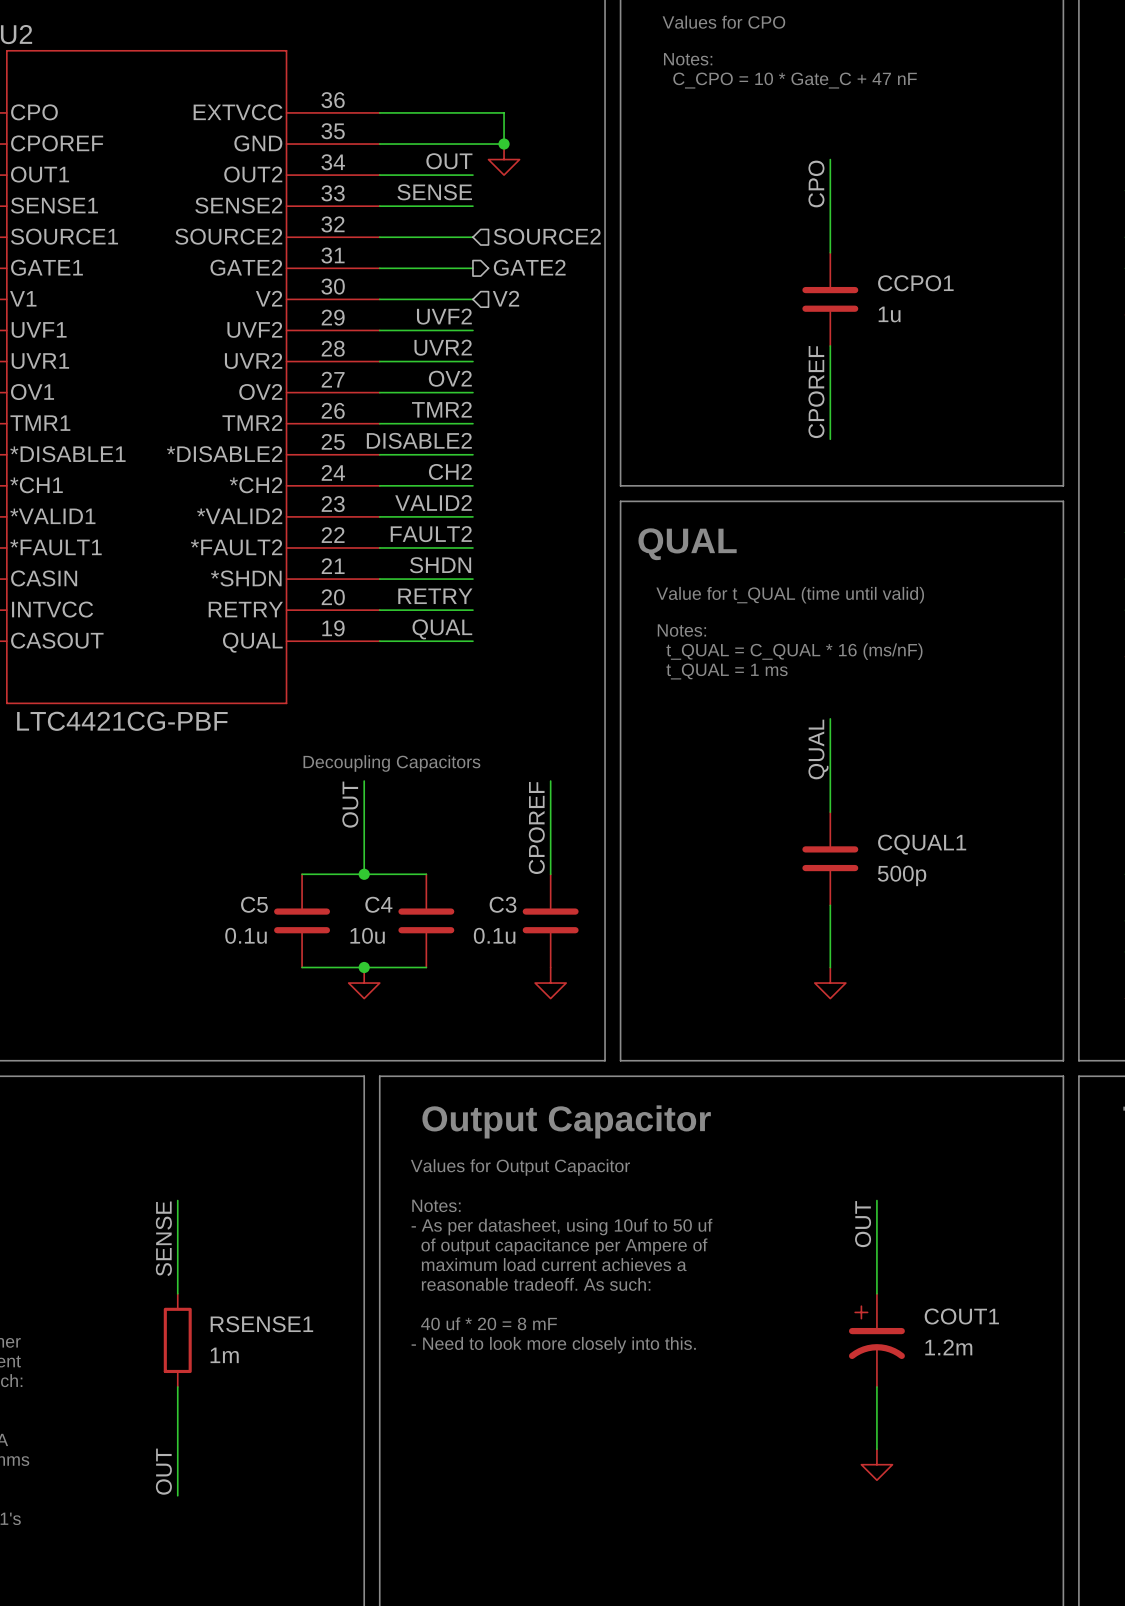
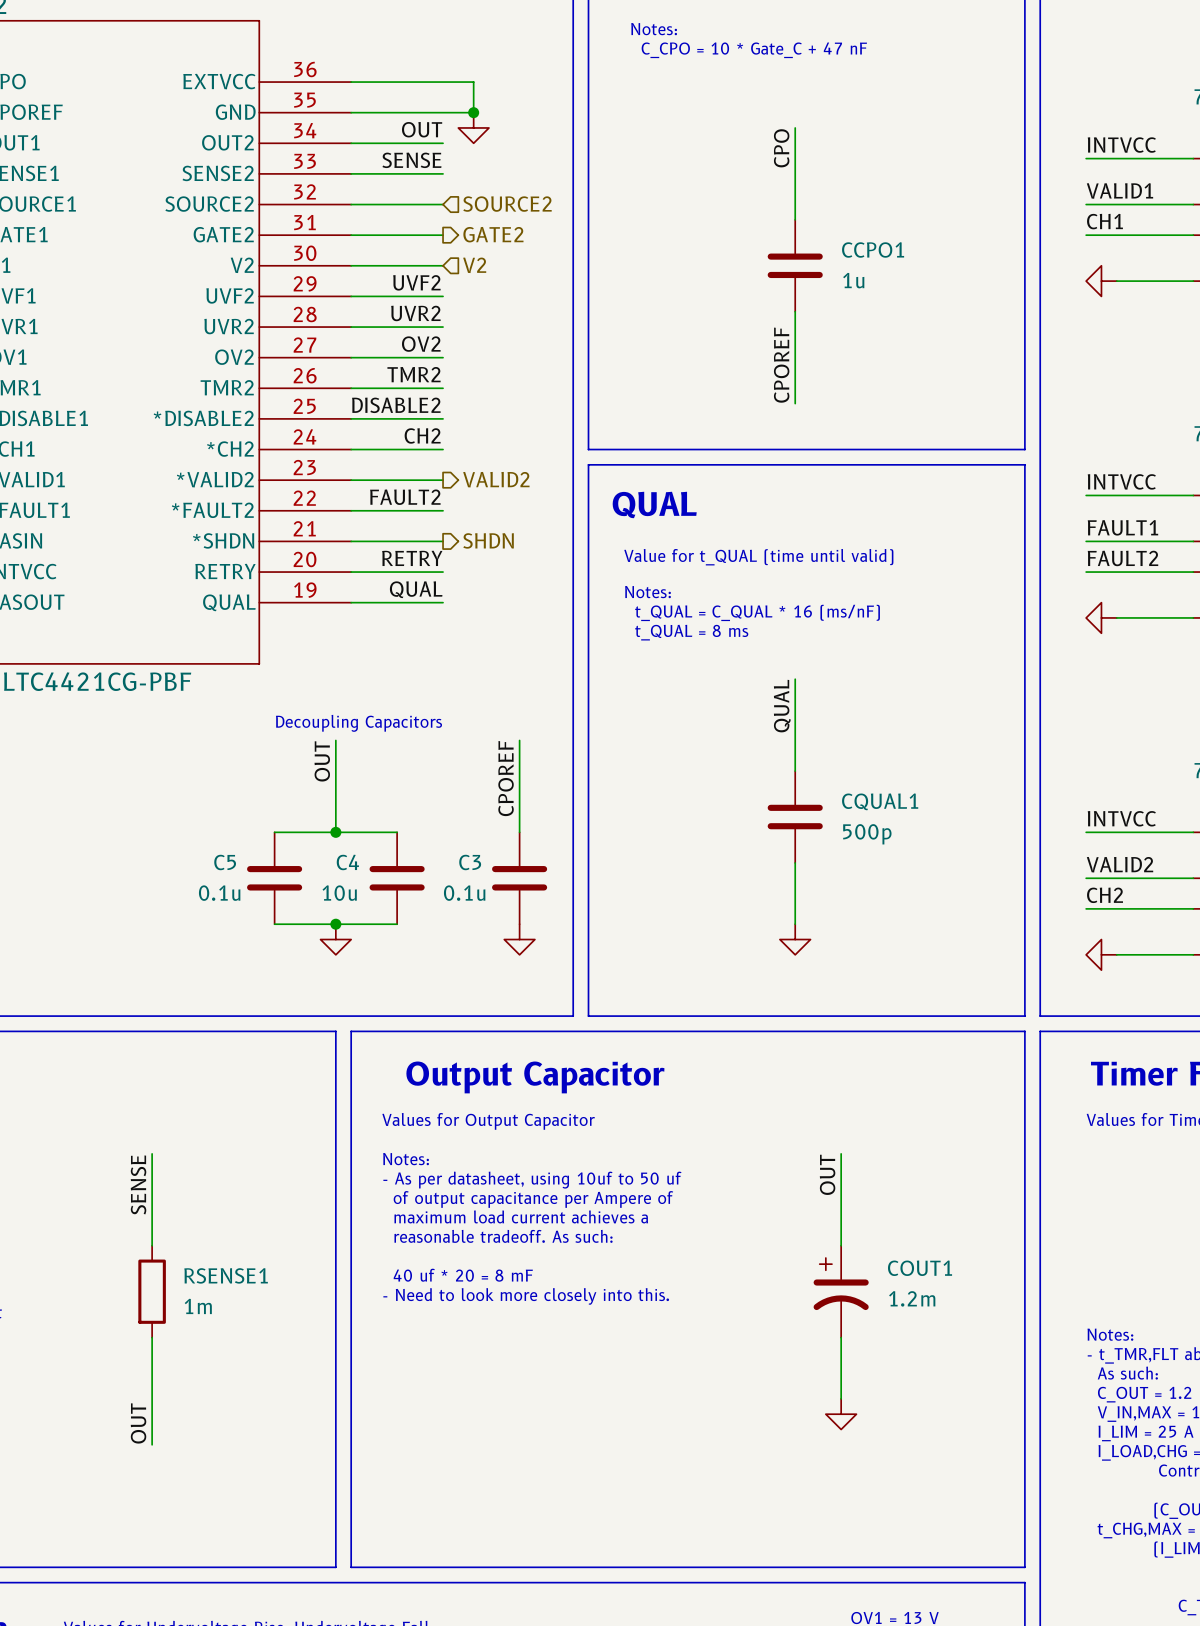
label: VALID2 (433, 502) -> none
hierarchical label: none -> VALID2 (496, 479)
label: SHDN (440, 565) -> none
hierarchical label: none -> SHDN (488, 540)
text: t_QUAL = 1 ms (727, 671) -> t_QUAL = 8 ms (691, 632)

